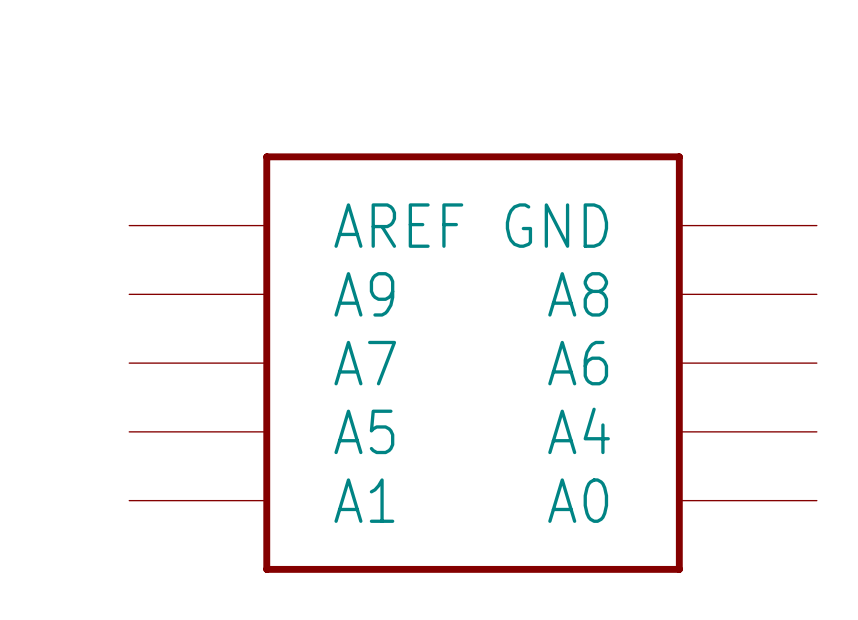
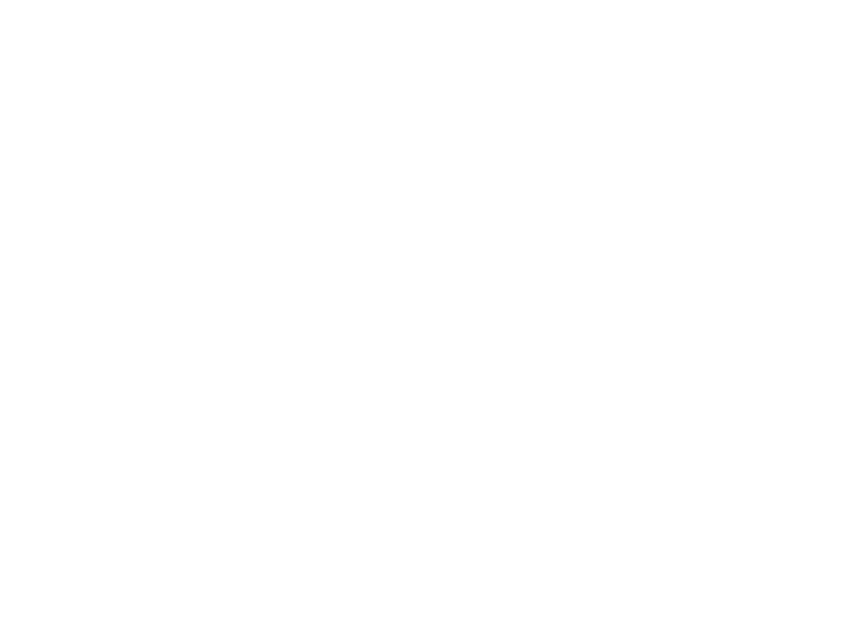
part: (473, 363) -> none

